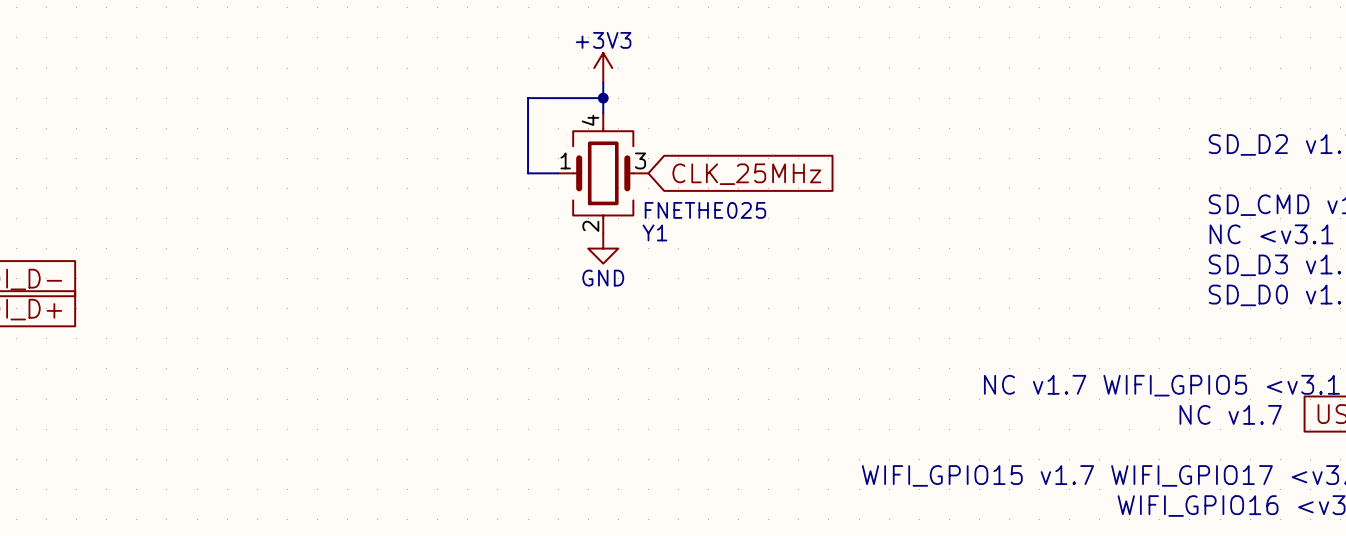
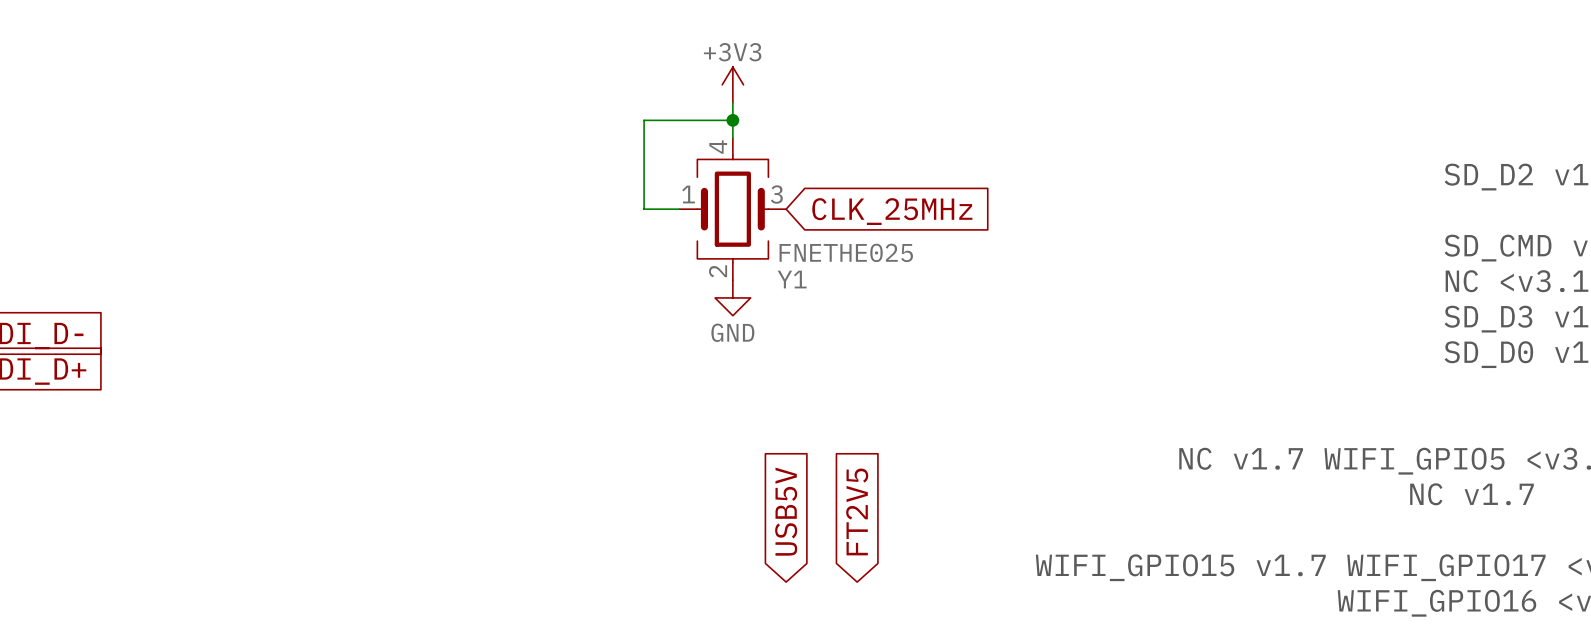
global label: none -> USB5V (786, 511)
global label: none -> FT2V5 (857, 511)

